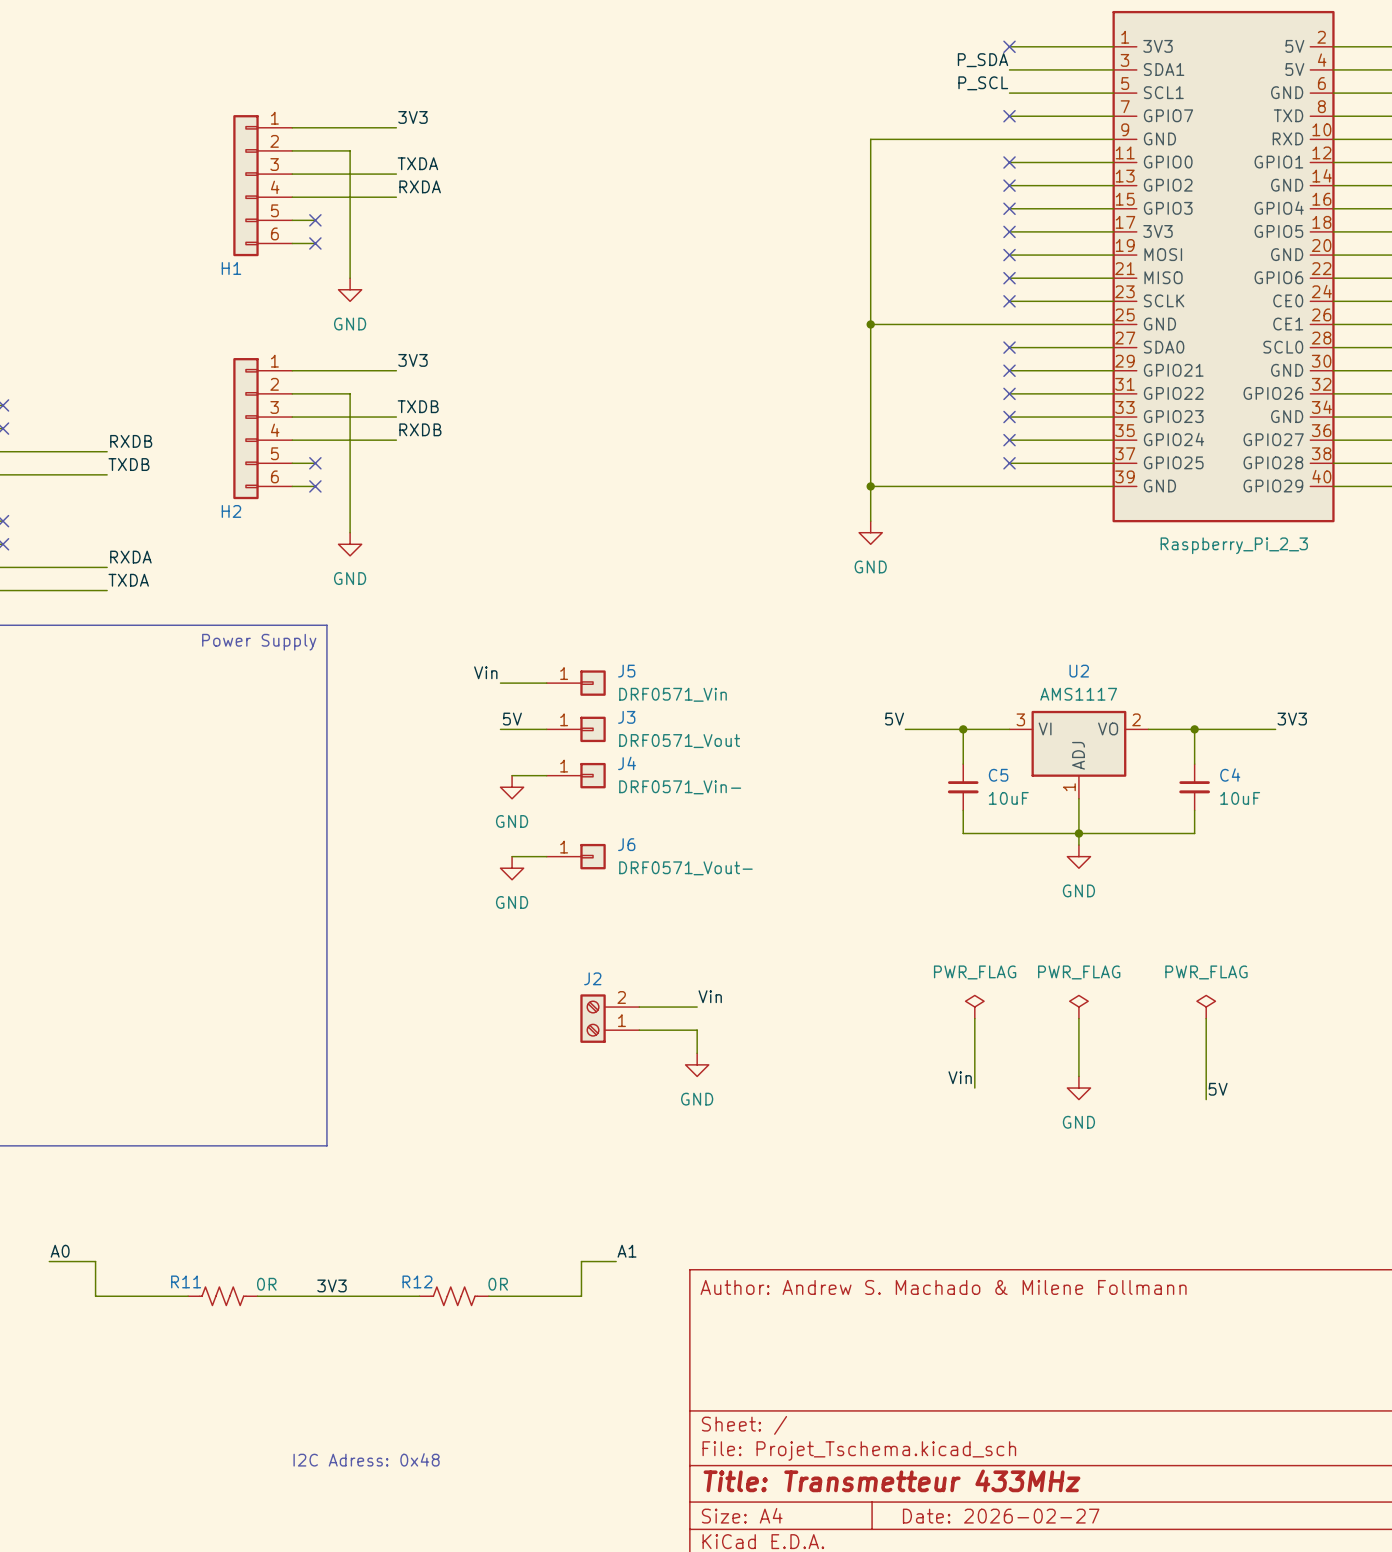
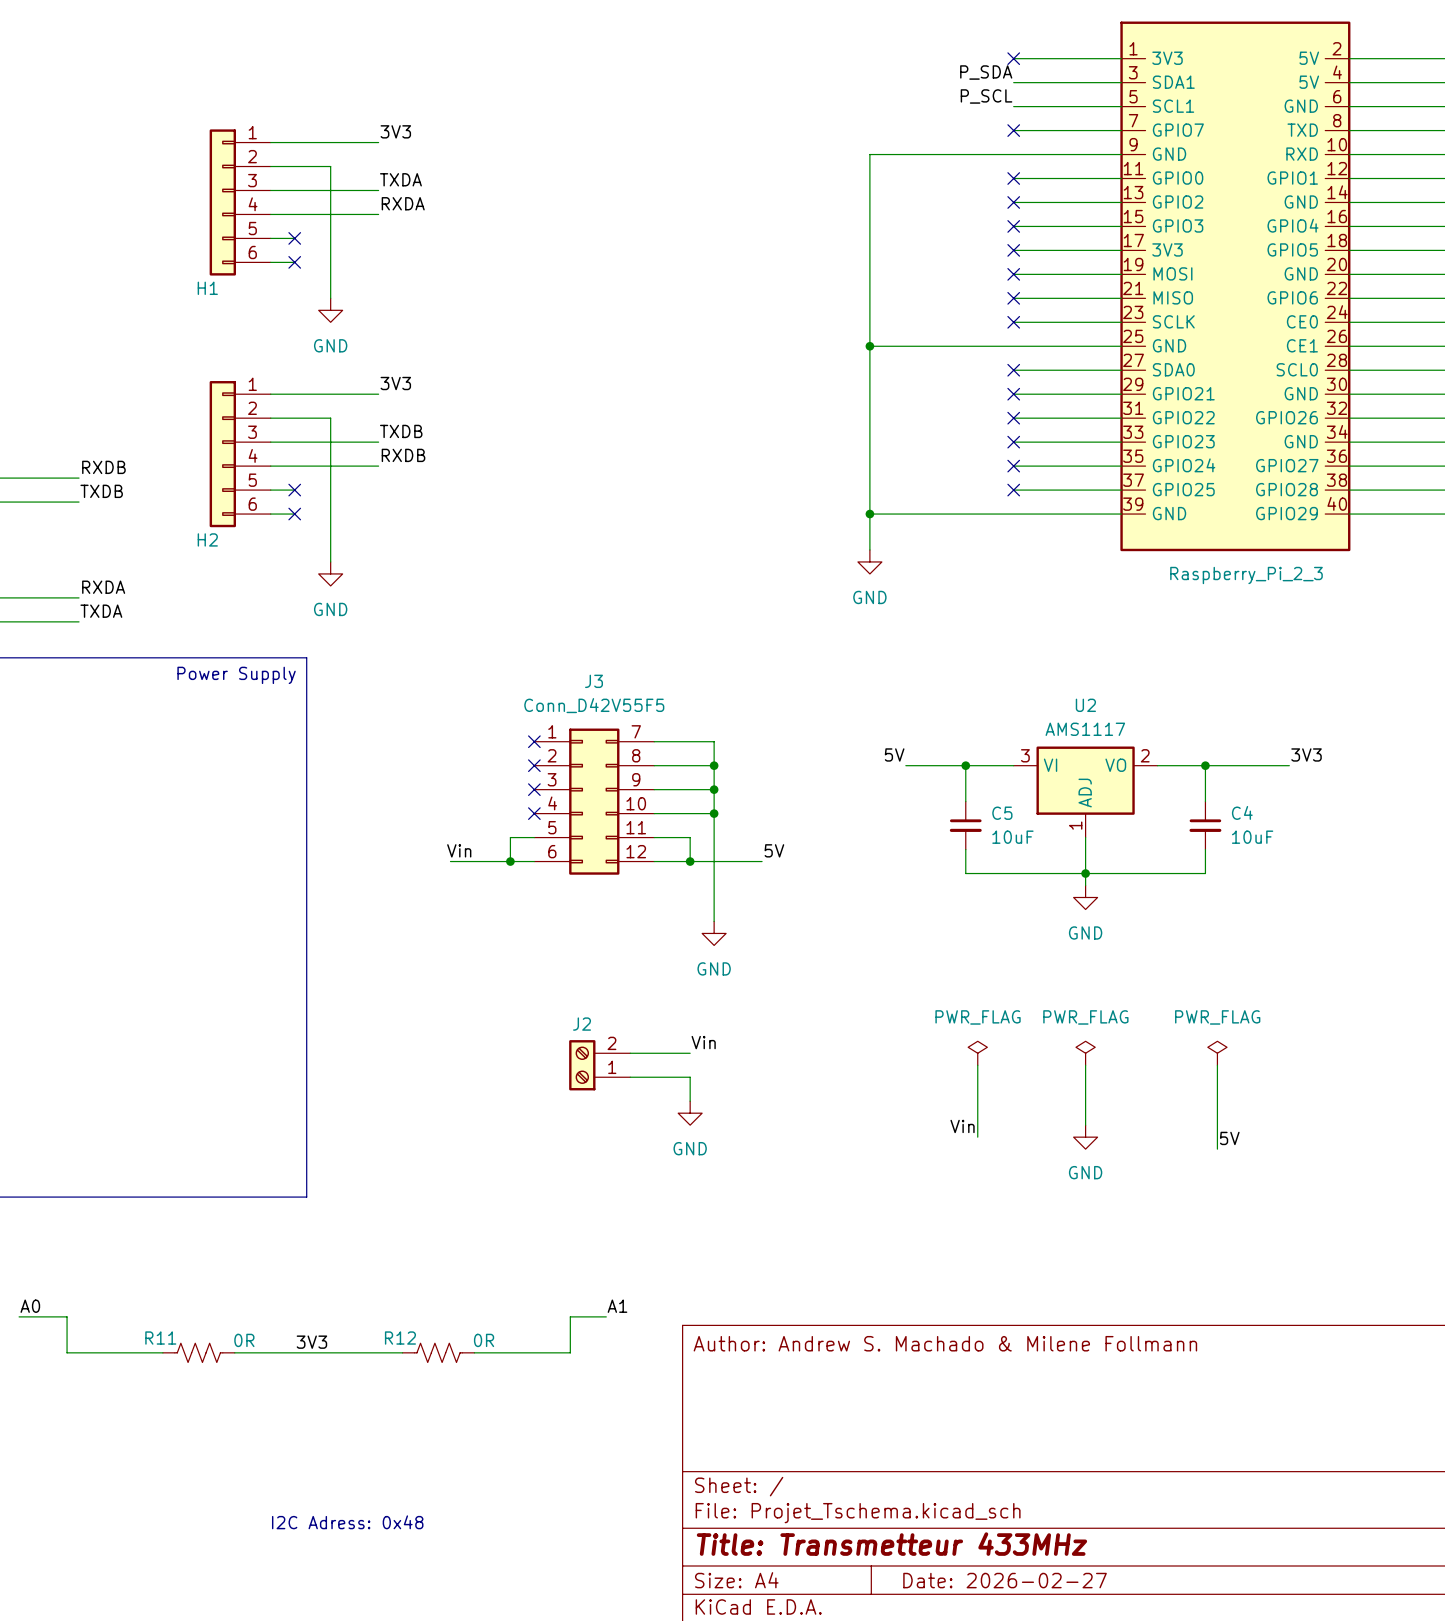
label position: Vin (485, 672) -> Vin (459, 850)
wire: (500, 683) (546, 683) -> none
J5: DRF0571_Vin (576, 683) -> none
no-connect mark: none -> (534, 741)
wire: none -> (654, 741) (714, 741) (714, 921)
J3 symbol: [546, 716, 606, 743] -> [534, 728, 655, 875]
J3 name position: J3 (626, 717) -> J3 (594, 681)
label: 5V (512, 719) -> none
wire: (500, 729) (546, 729) -> none
no-connect mark: none -> (534, 765)
wire: none -> (654, 765) (714, 765)
junction: none -> (714, 765)
J3 value: DRF0571_Vout (679, 741) -> Conn_D42V55F5 (594, 705)
no-connect mark: none -> (534, 789)
wire: none -> (654, 789) (714, 789)
junction: none -> (714, 789)
wire: (512, 775) (546, 775) -> none
no-connect mark: none -> (534, 813)
J4: DRF0571_Vin- (576, 775) -> none
wire: none -> (654, 813) (714, 813)
junction: none -> (714, 813)
power symbol: GND (512, 787) -> none
wire: none -> (534, 837) (510, 837) (510, 861)
wire: none -> (654, 837) (690, 837) (690, 861)
label: none -> 5V (774, 850)
wire: none -> (450, 861) (534, 861)
junction: none -> (510, 861)
wire: none -> (654, 861) (762, 861)
junction: none -> (690, 861)
wire: (512, 856) (546, 856) -> none
J6: DRF0571_Vout- (576, 856) -> none
power symbol: GND (512, 868) -> none
power symbol: none -> GND (714, 933)

